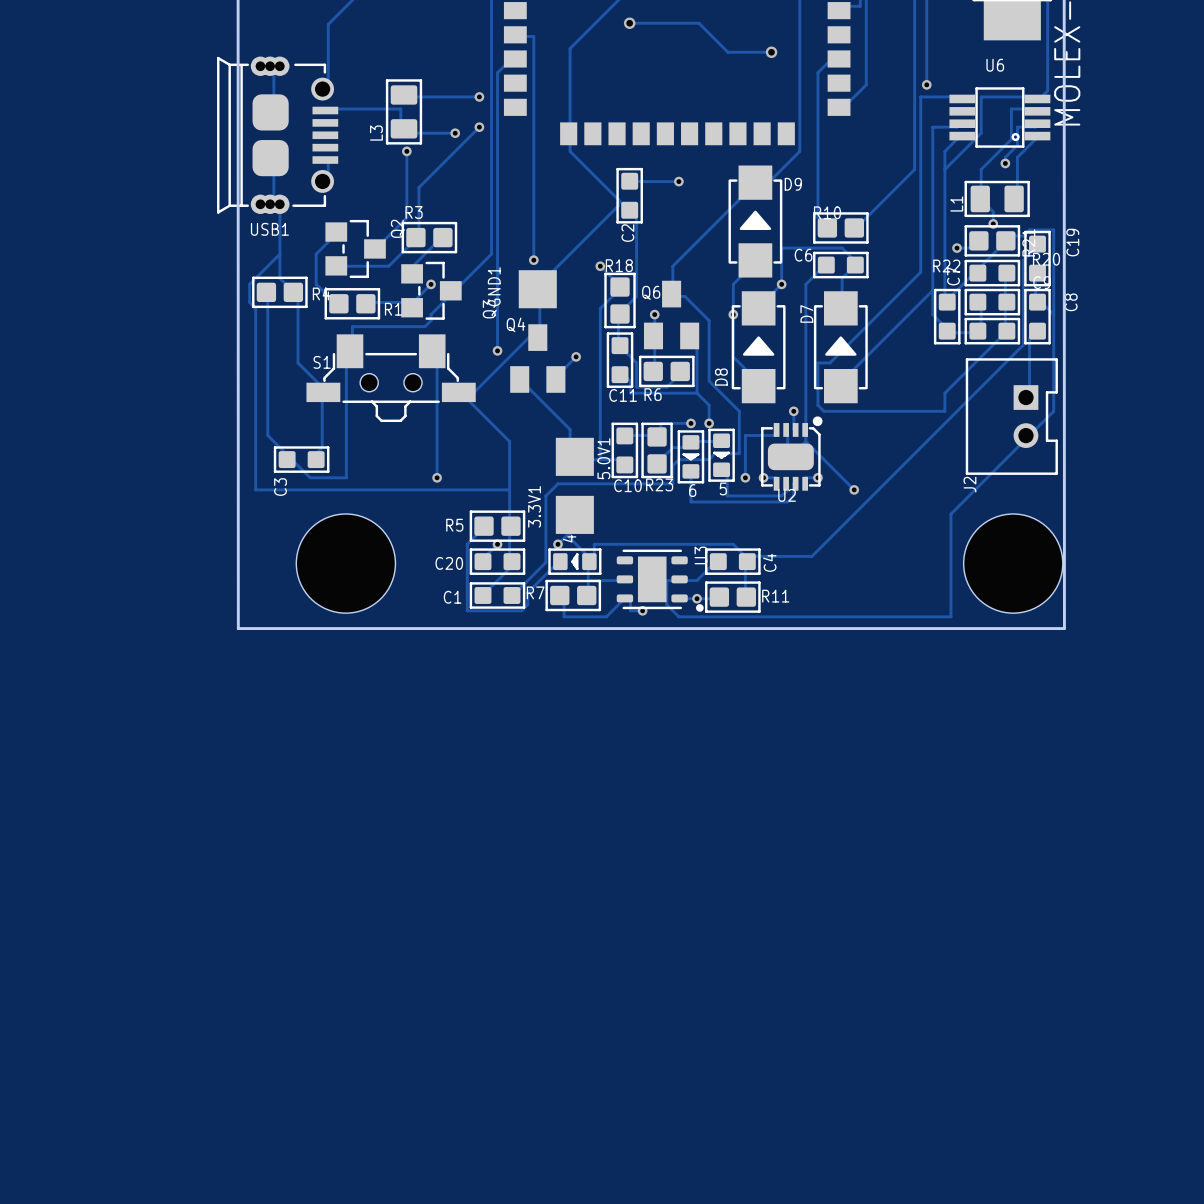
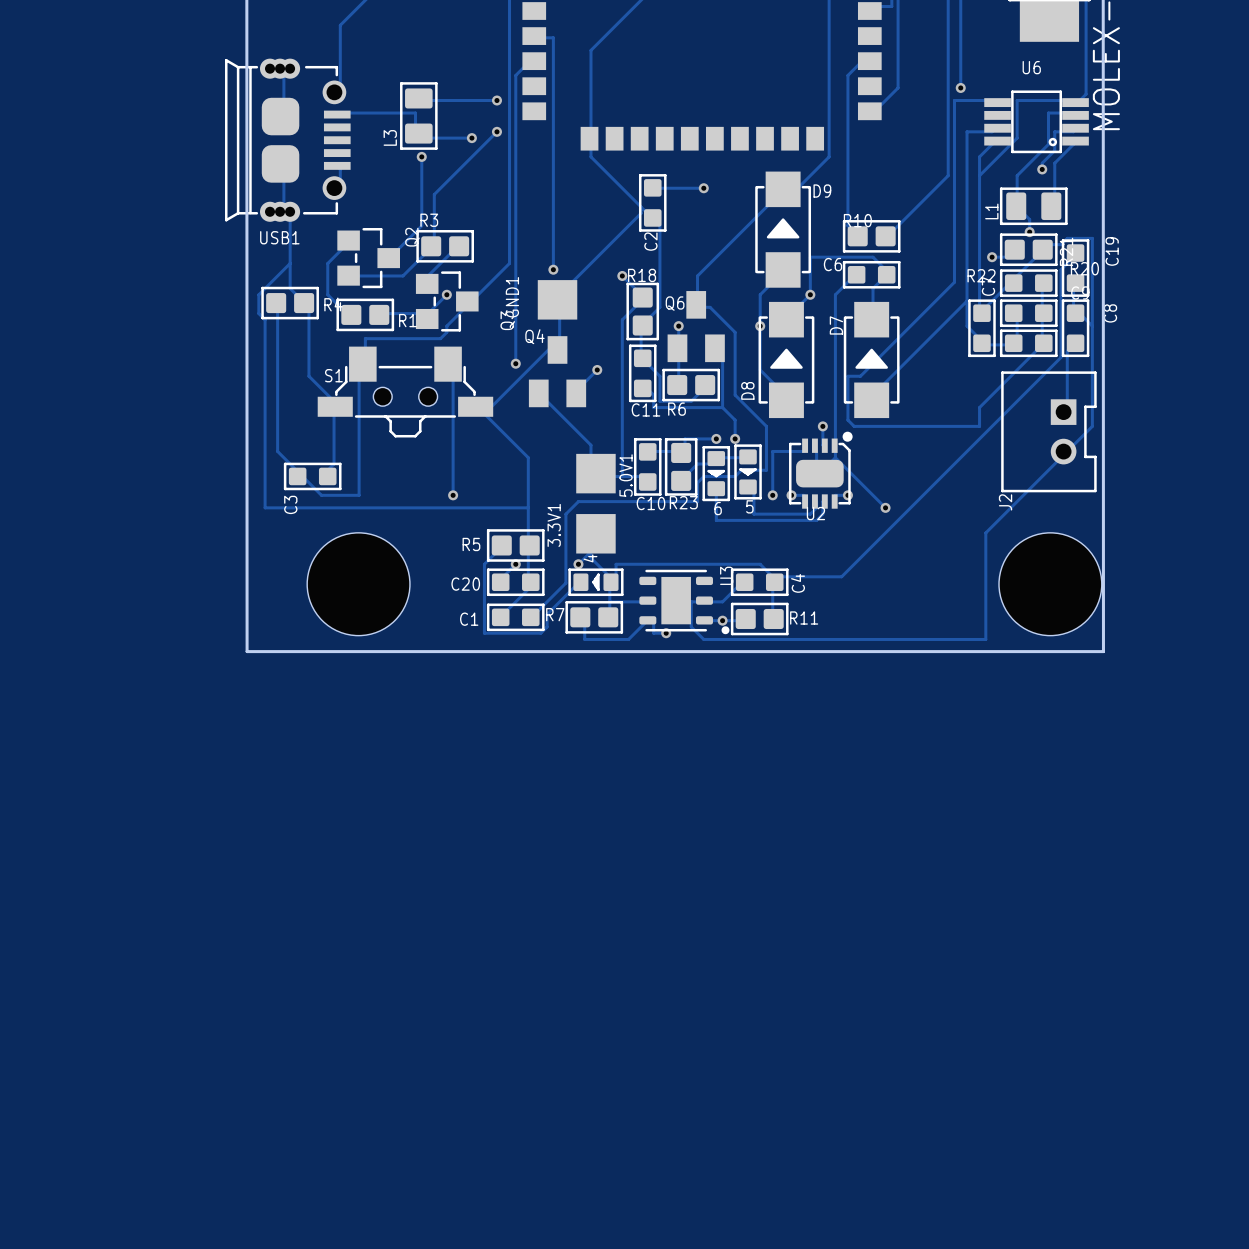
track: (629, 23) (698, 23) (728, 52) (771, 52) -> none
via: (629, 23) -> none
via: (771, 52) -> none

